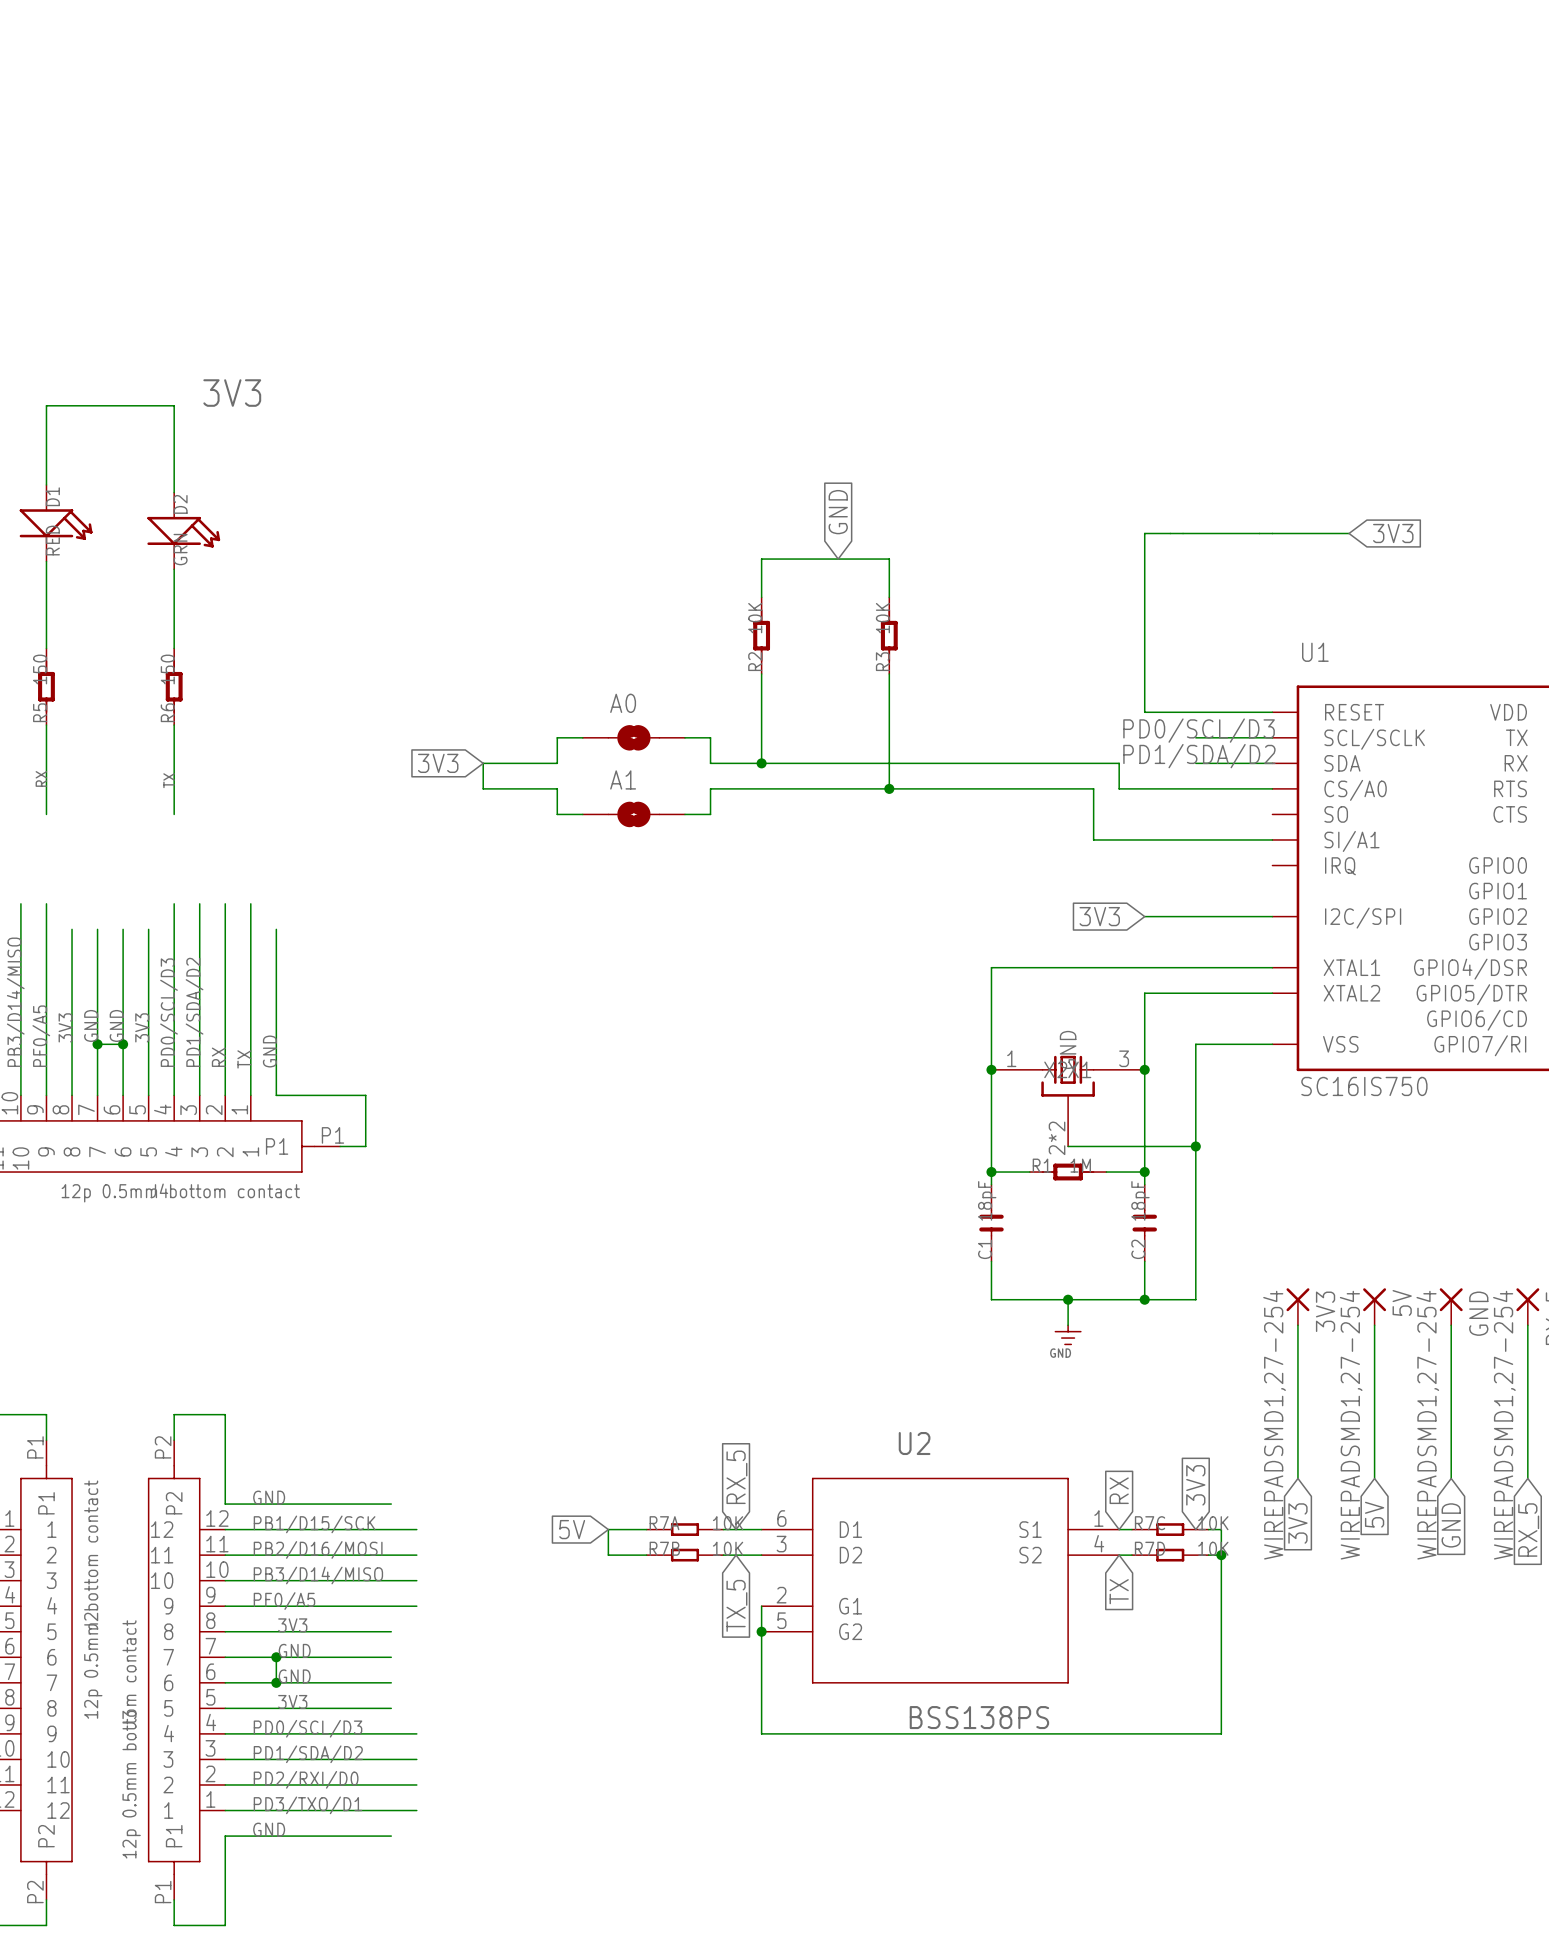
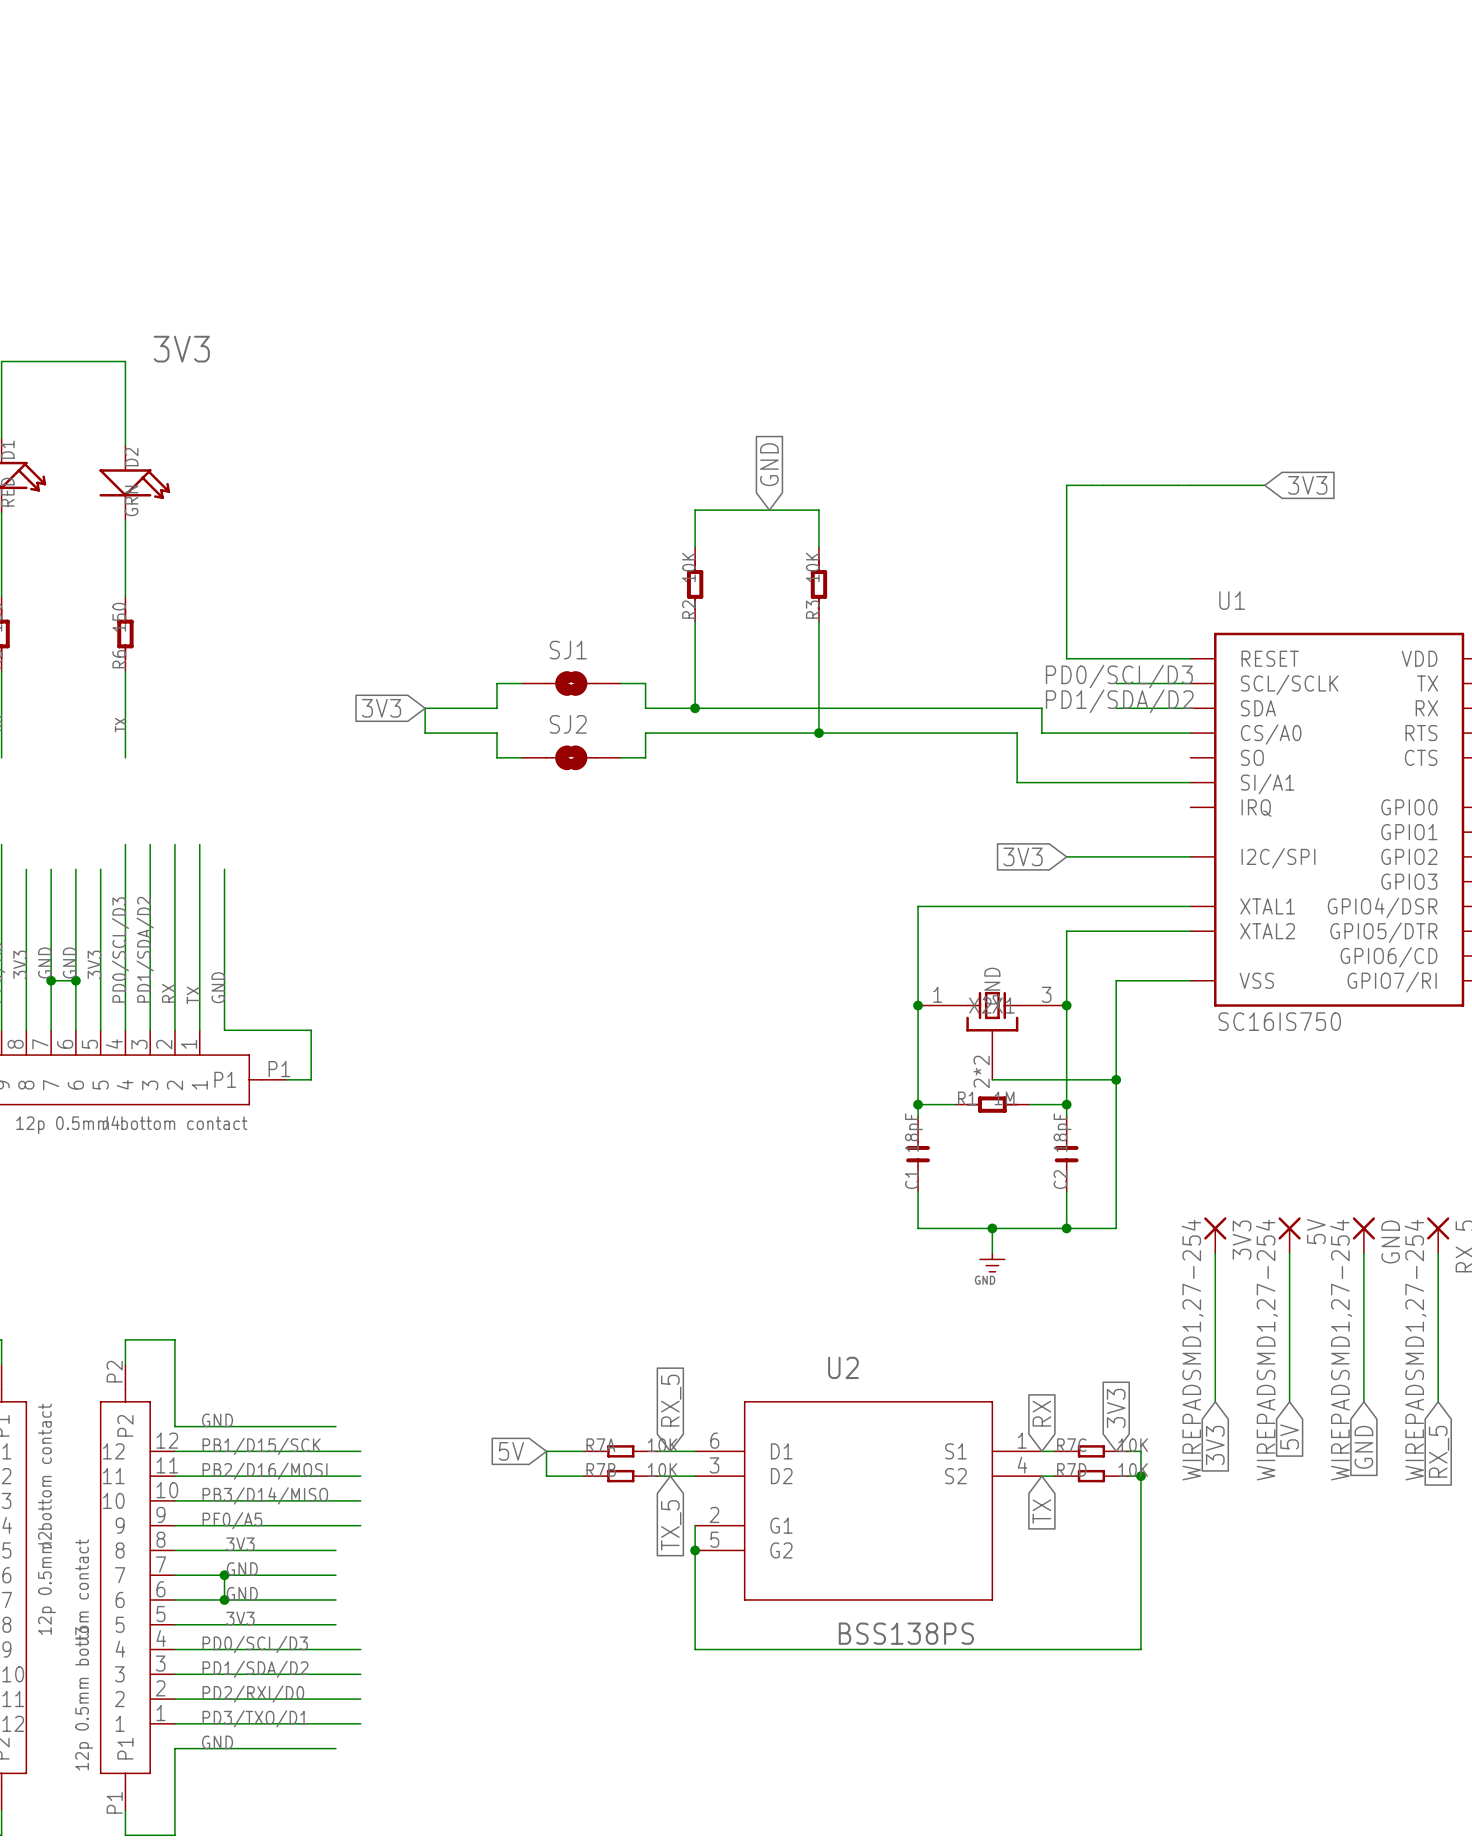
A0 name: A0 (623, 703) -> SJ1 (568, 650)
A1 name: A1 (623, 779) -> SJ2 (568, 724)

